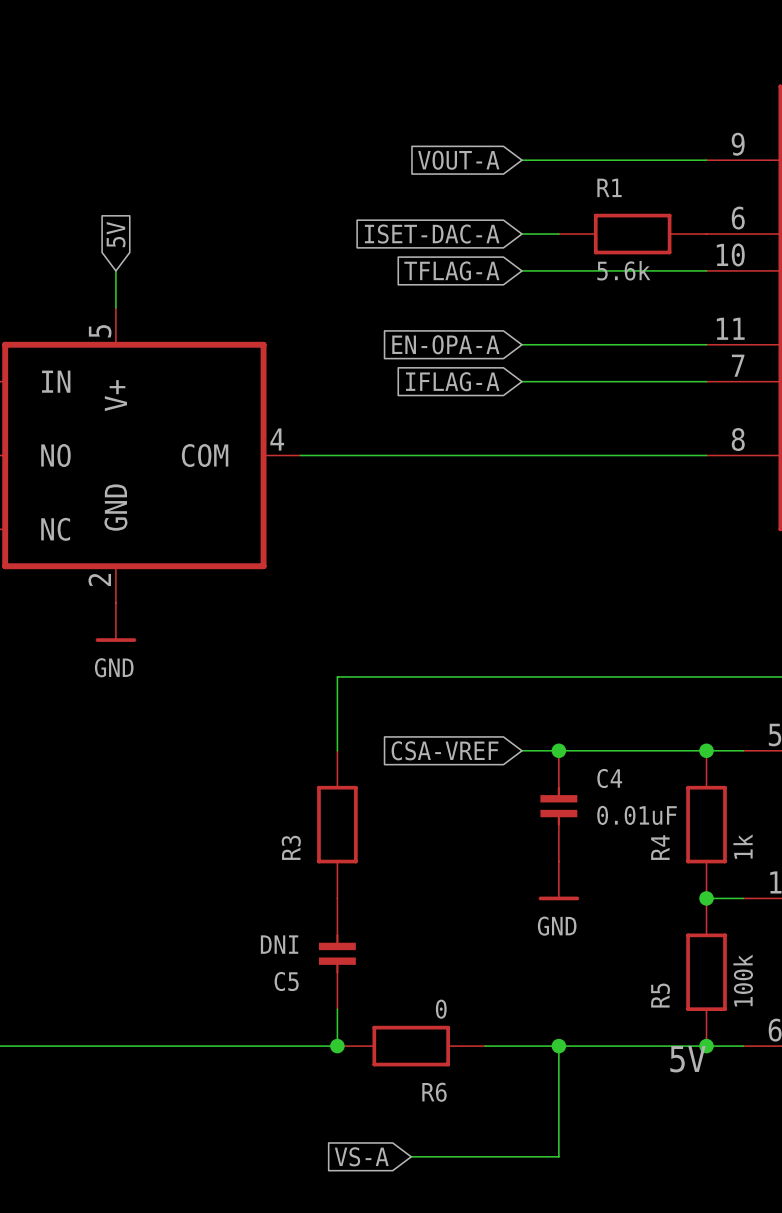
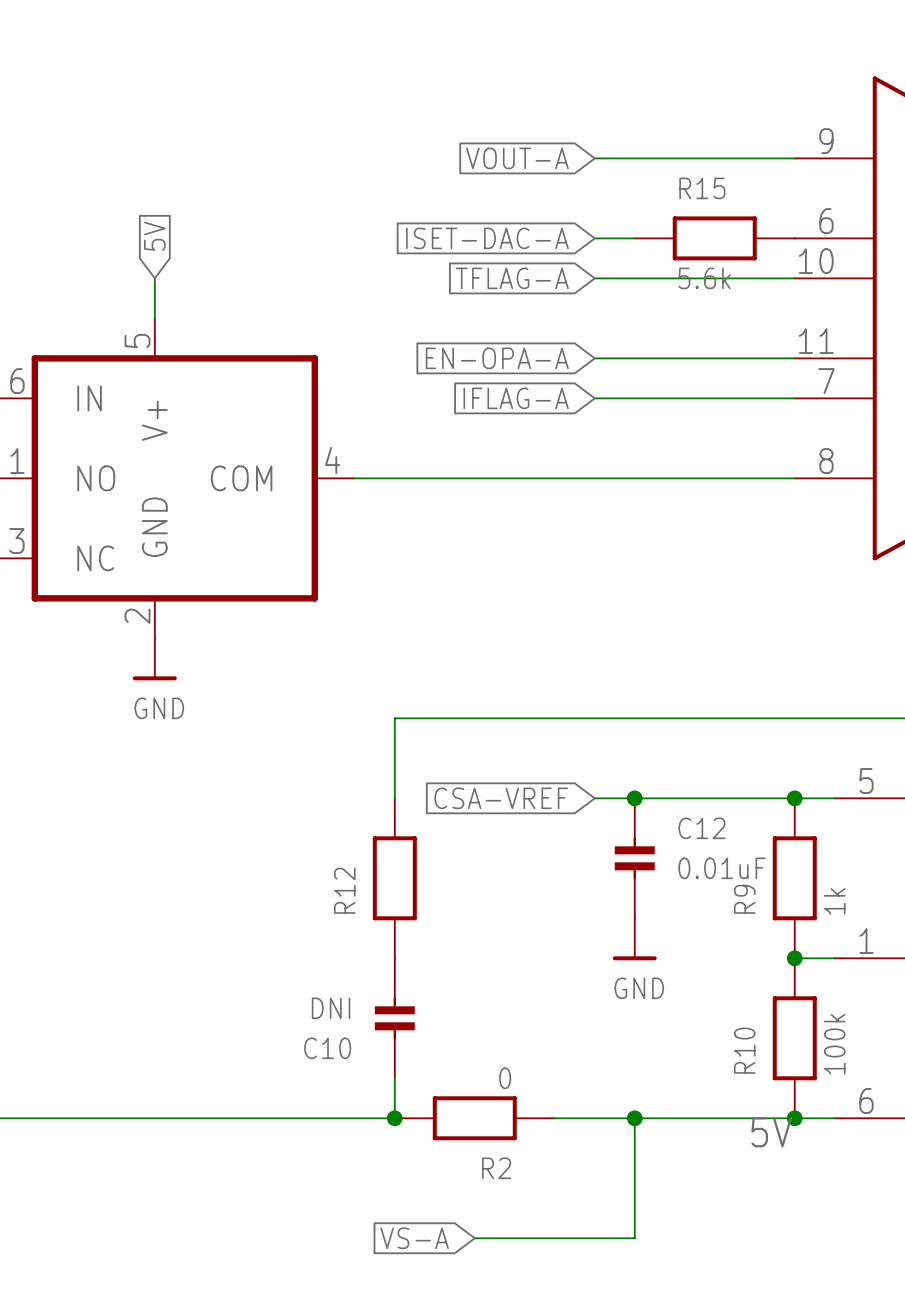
R1 name: R1 (609, 187) -> R15 (702, 188)
C4 name: C4 (609, 778) -> C12 (701, 828)
R3 name: R3 (291, 847) -> R12 (344, 890)
R4 name: R4 (660, 847) -> R9 (744, 899)
C5 name: C5 (286, 981) -> C10 (327, 1048)
R5 name: R5 (660, 995) -> R10 (744, 1050)
R6 name: R6 (434, 1092) -> R2 (496, 1168)

